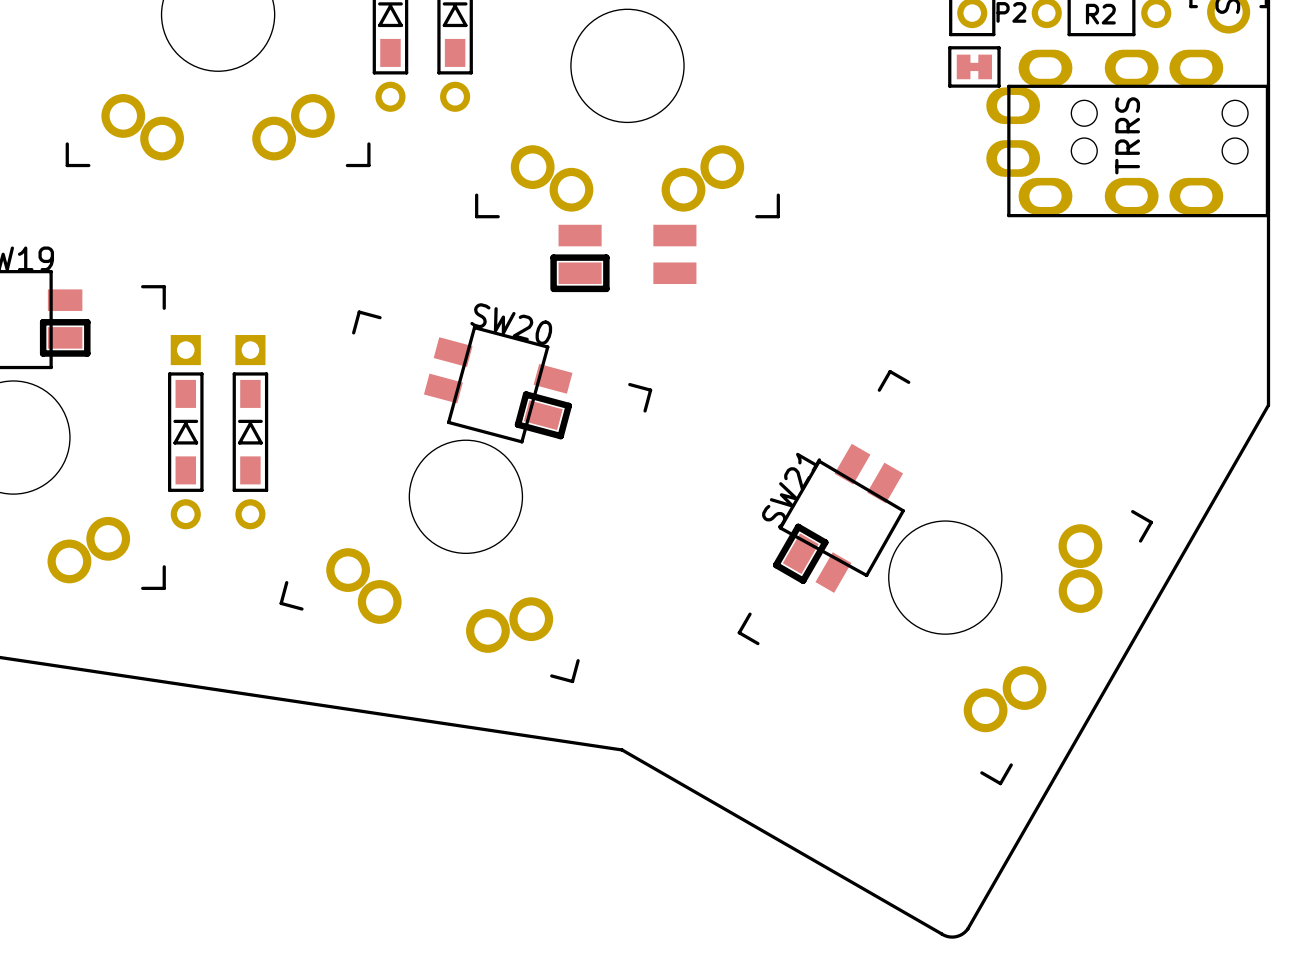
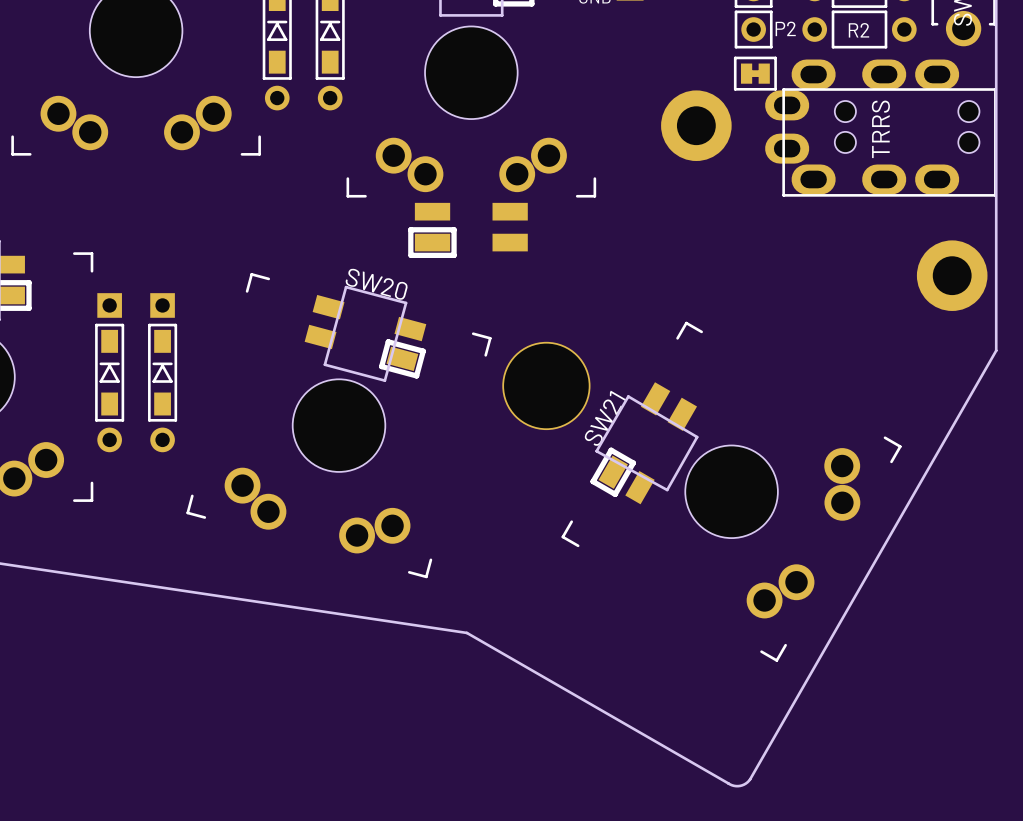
part: none -> (696, 125)
part: none -> (952, 275)
part: none -> (546, 385)

